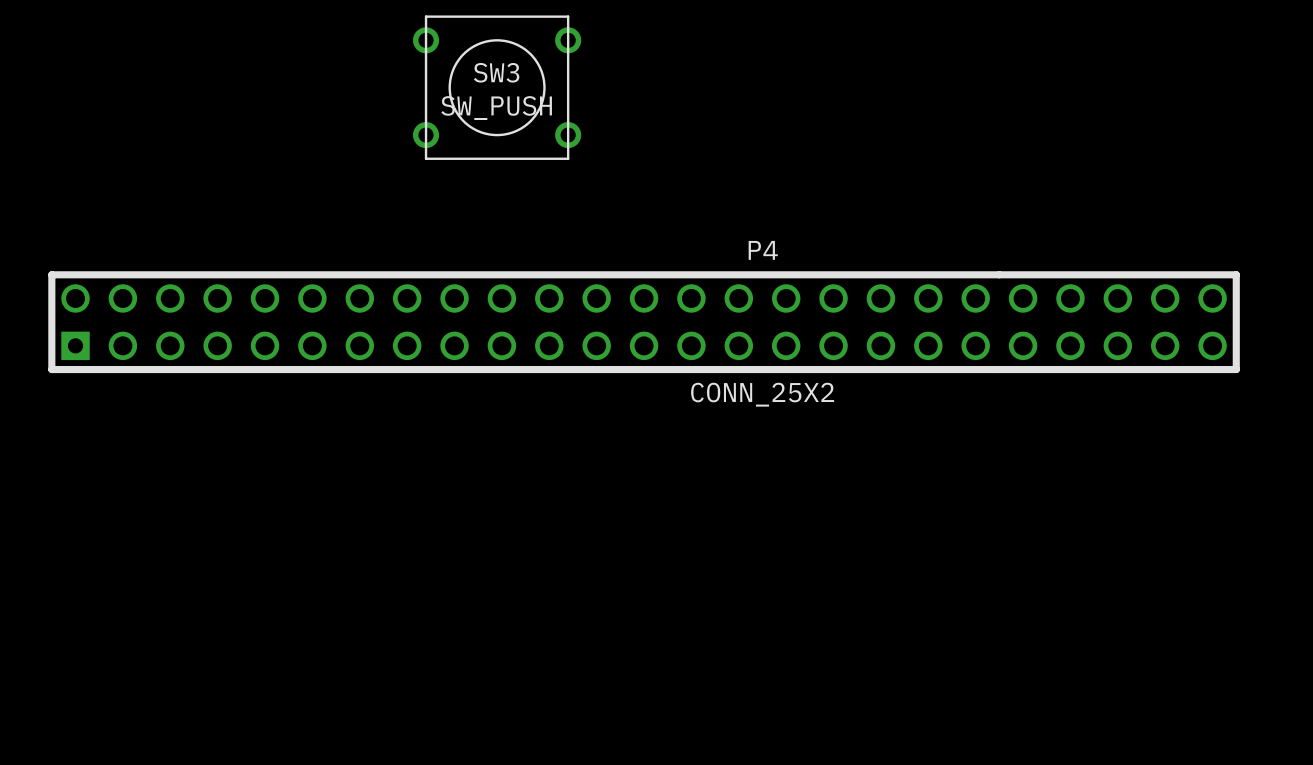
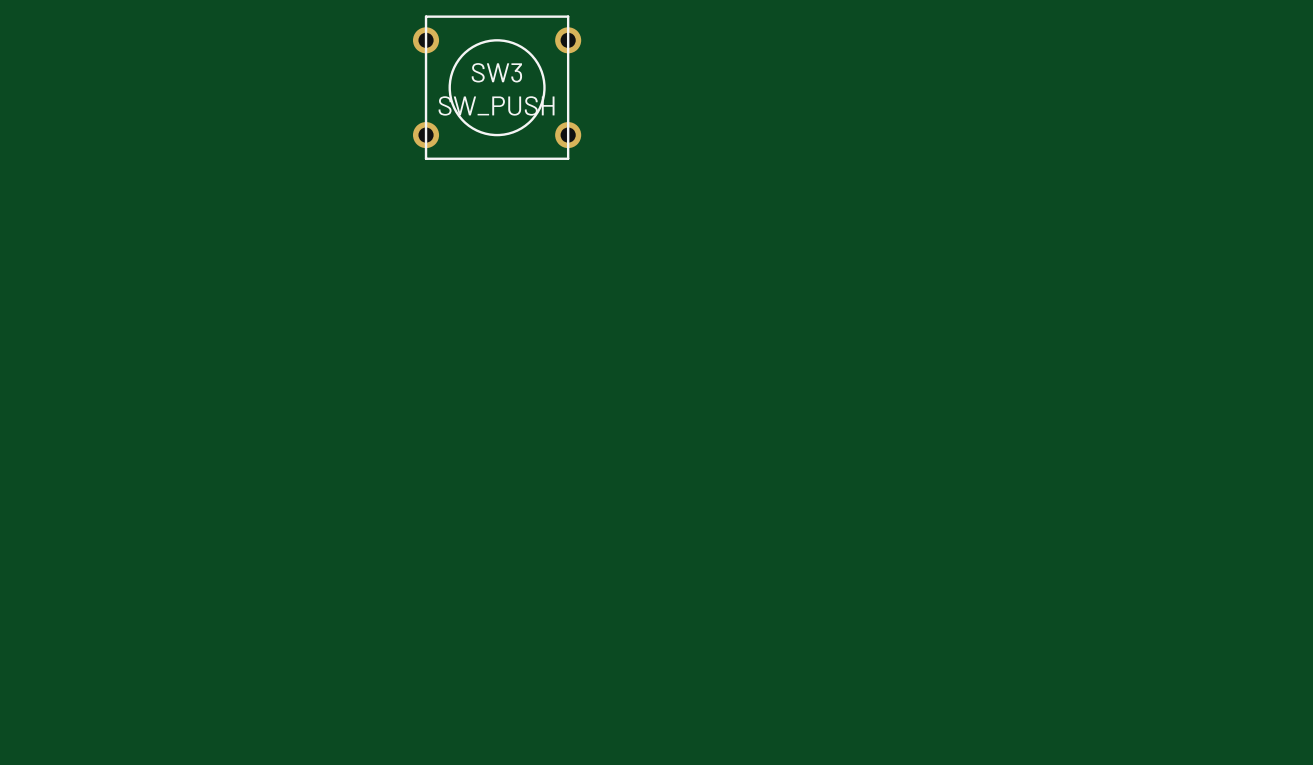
P4: CONN_25X2 (644, 322) -> none

